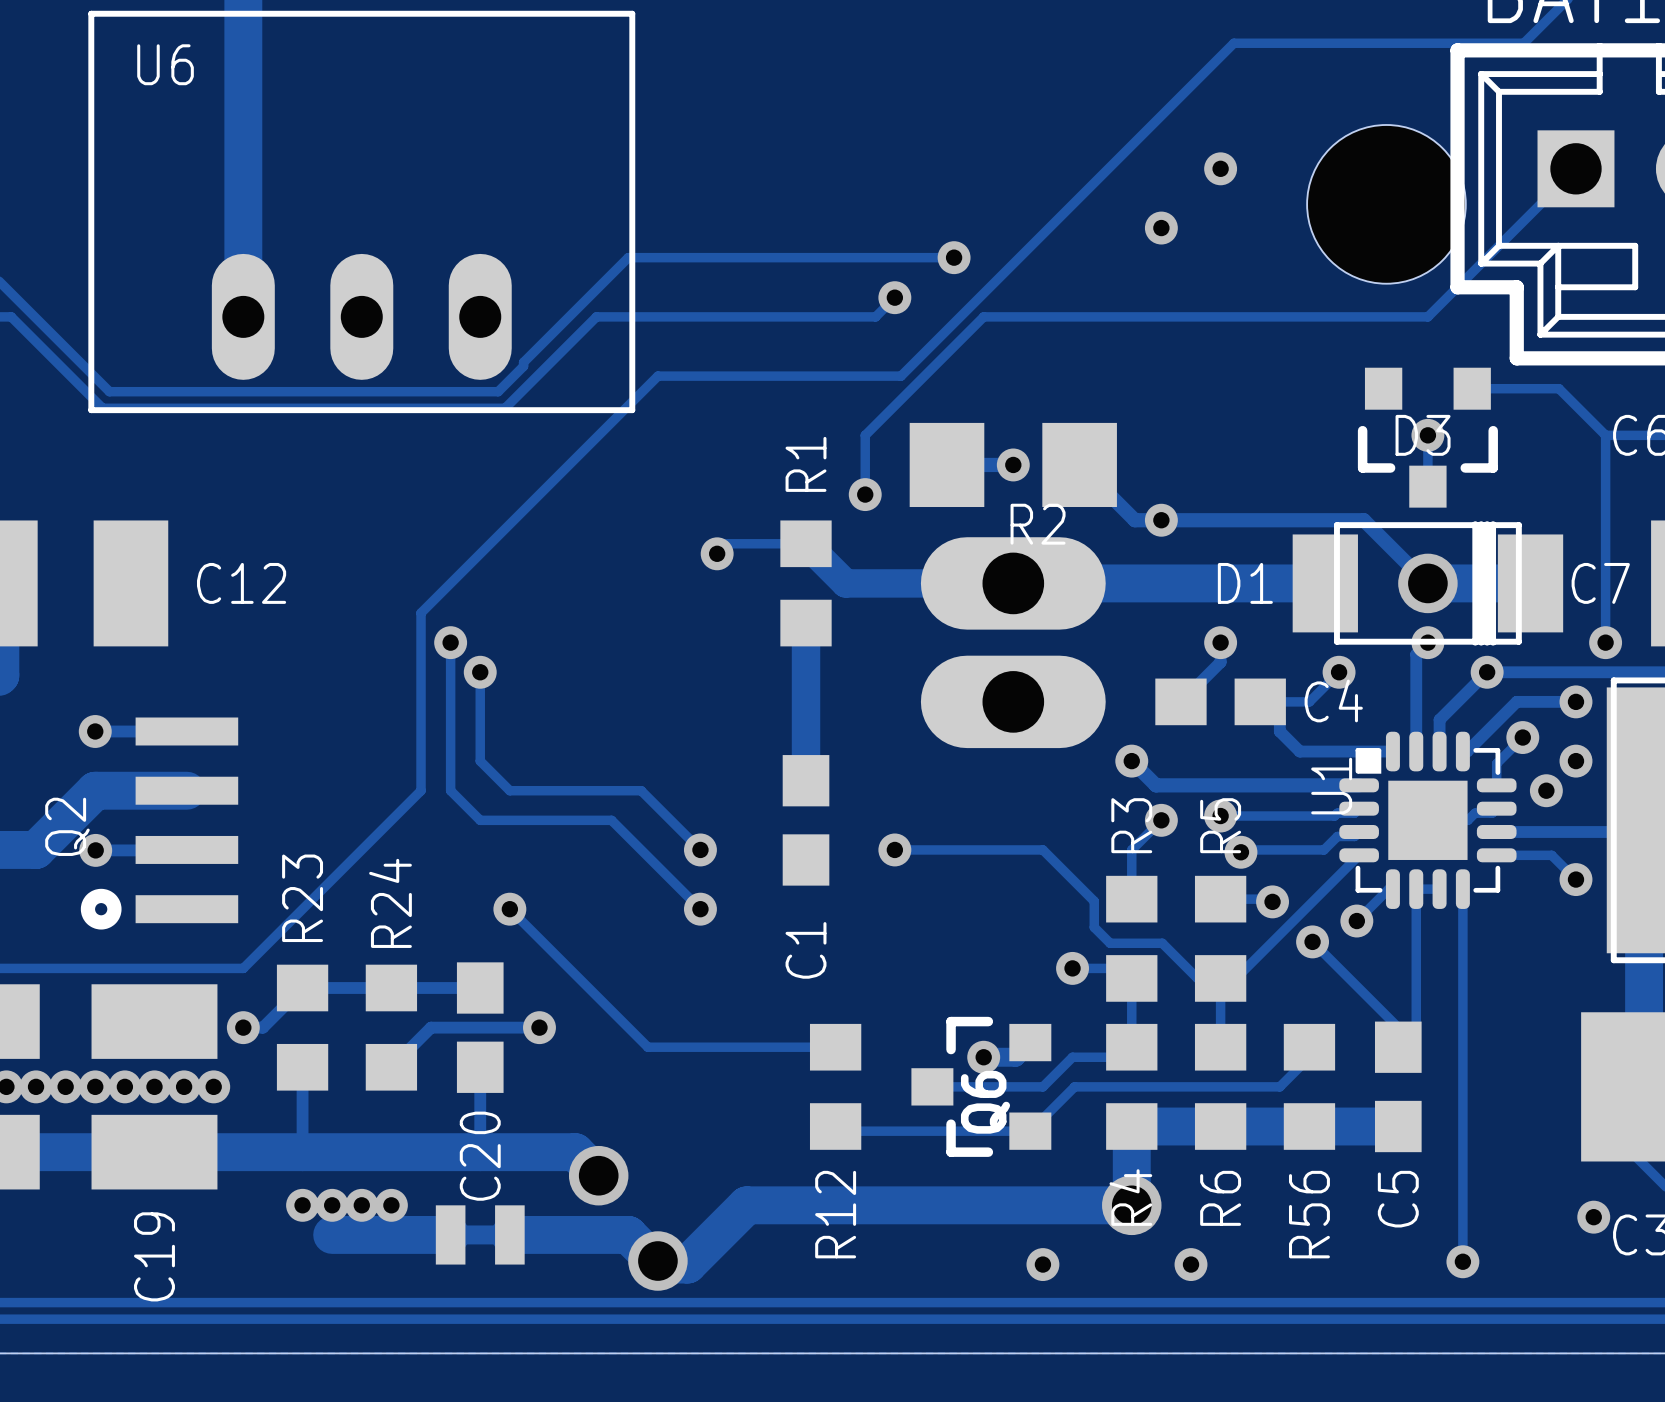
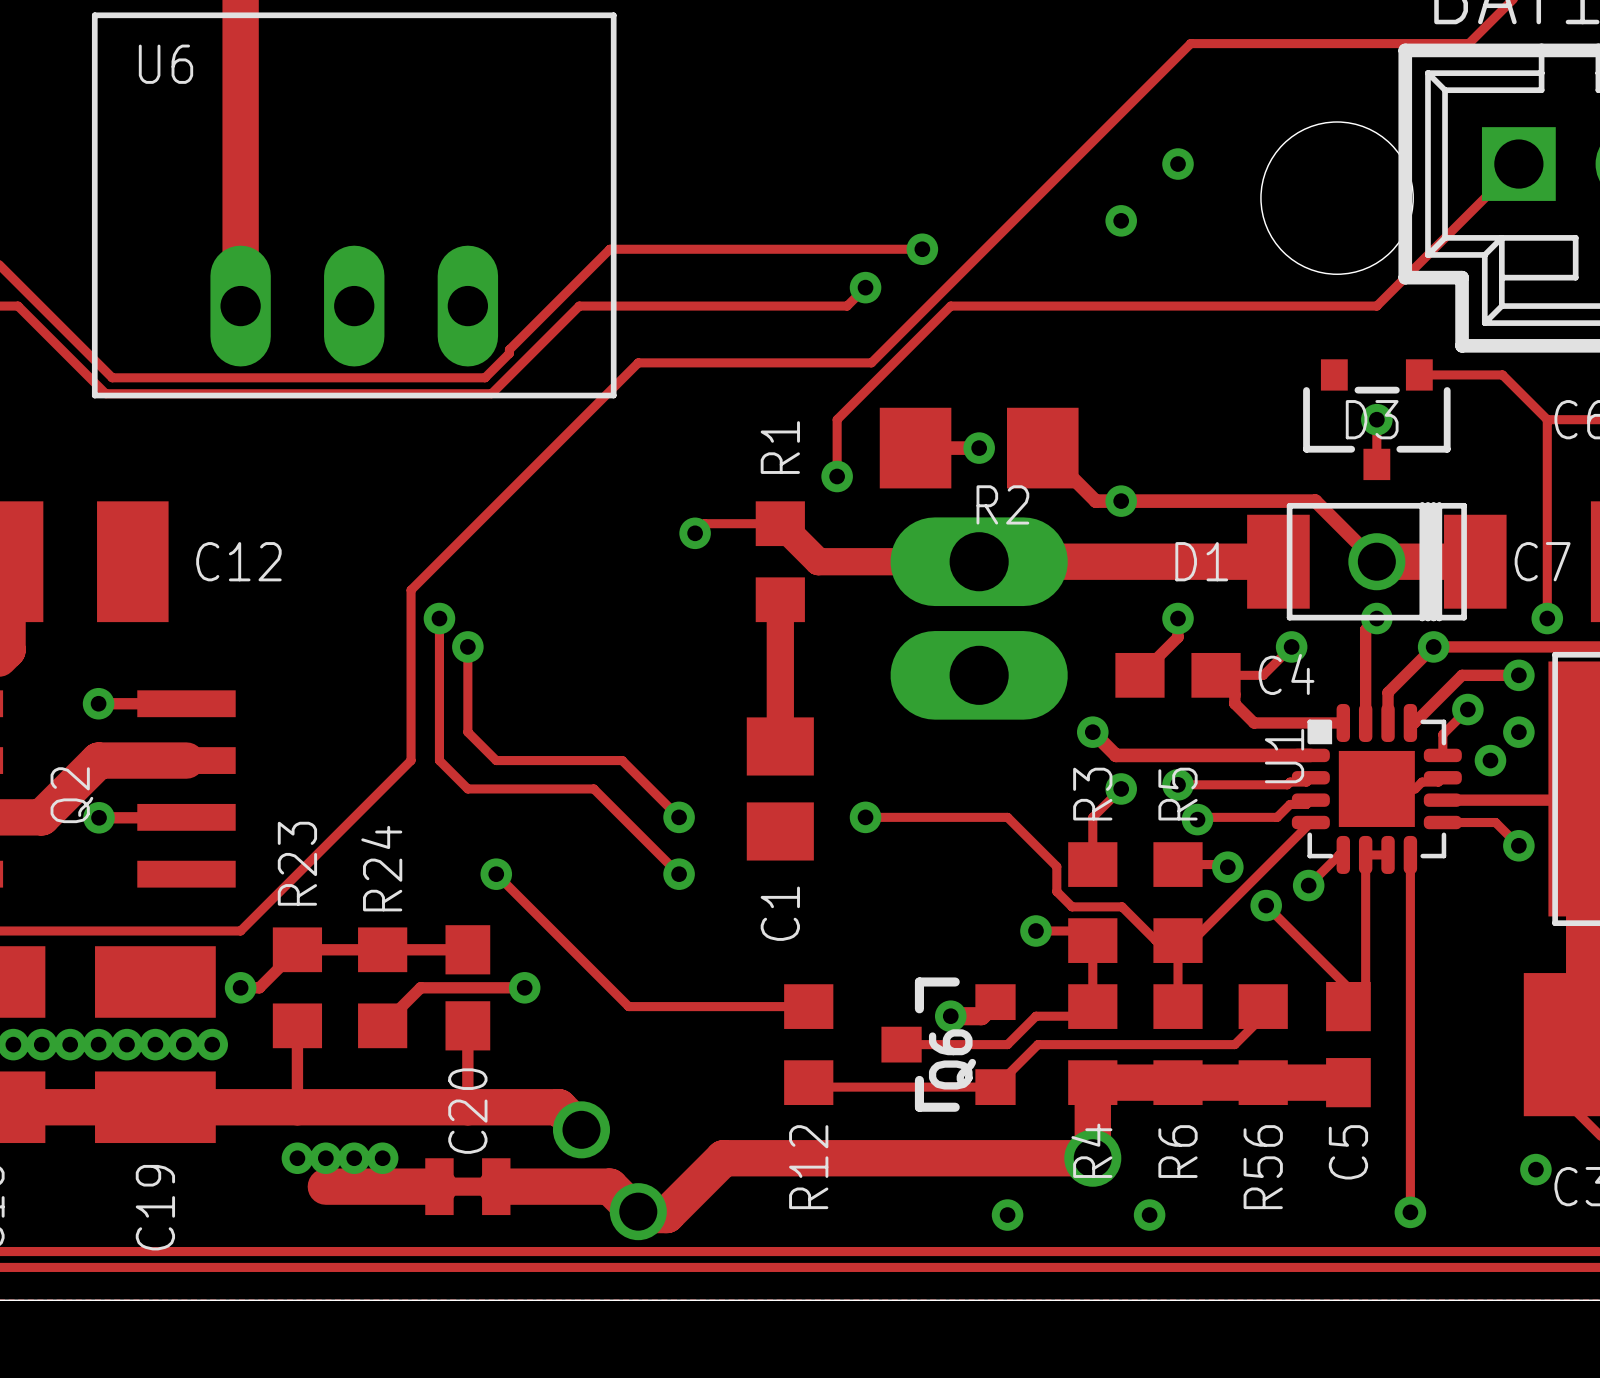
D3 footprint: [1357, 367, 1498, 508] -> [1303, 359, 1451, 481]
C1 footprint: [782, 755, 830, 886] -> [746, 717, 814, 861]
drawing: [80, 888, 122, 930] -> none

